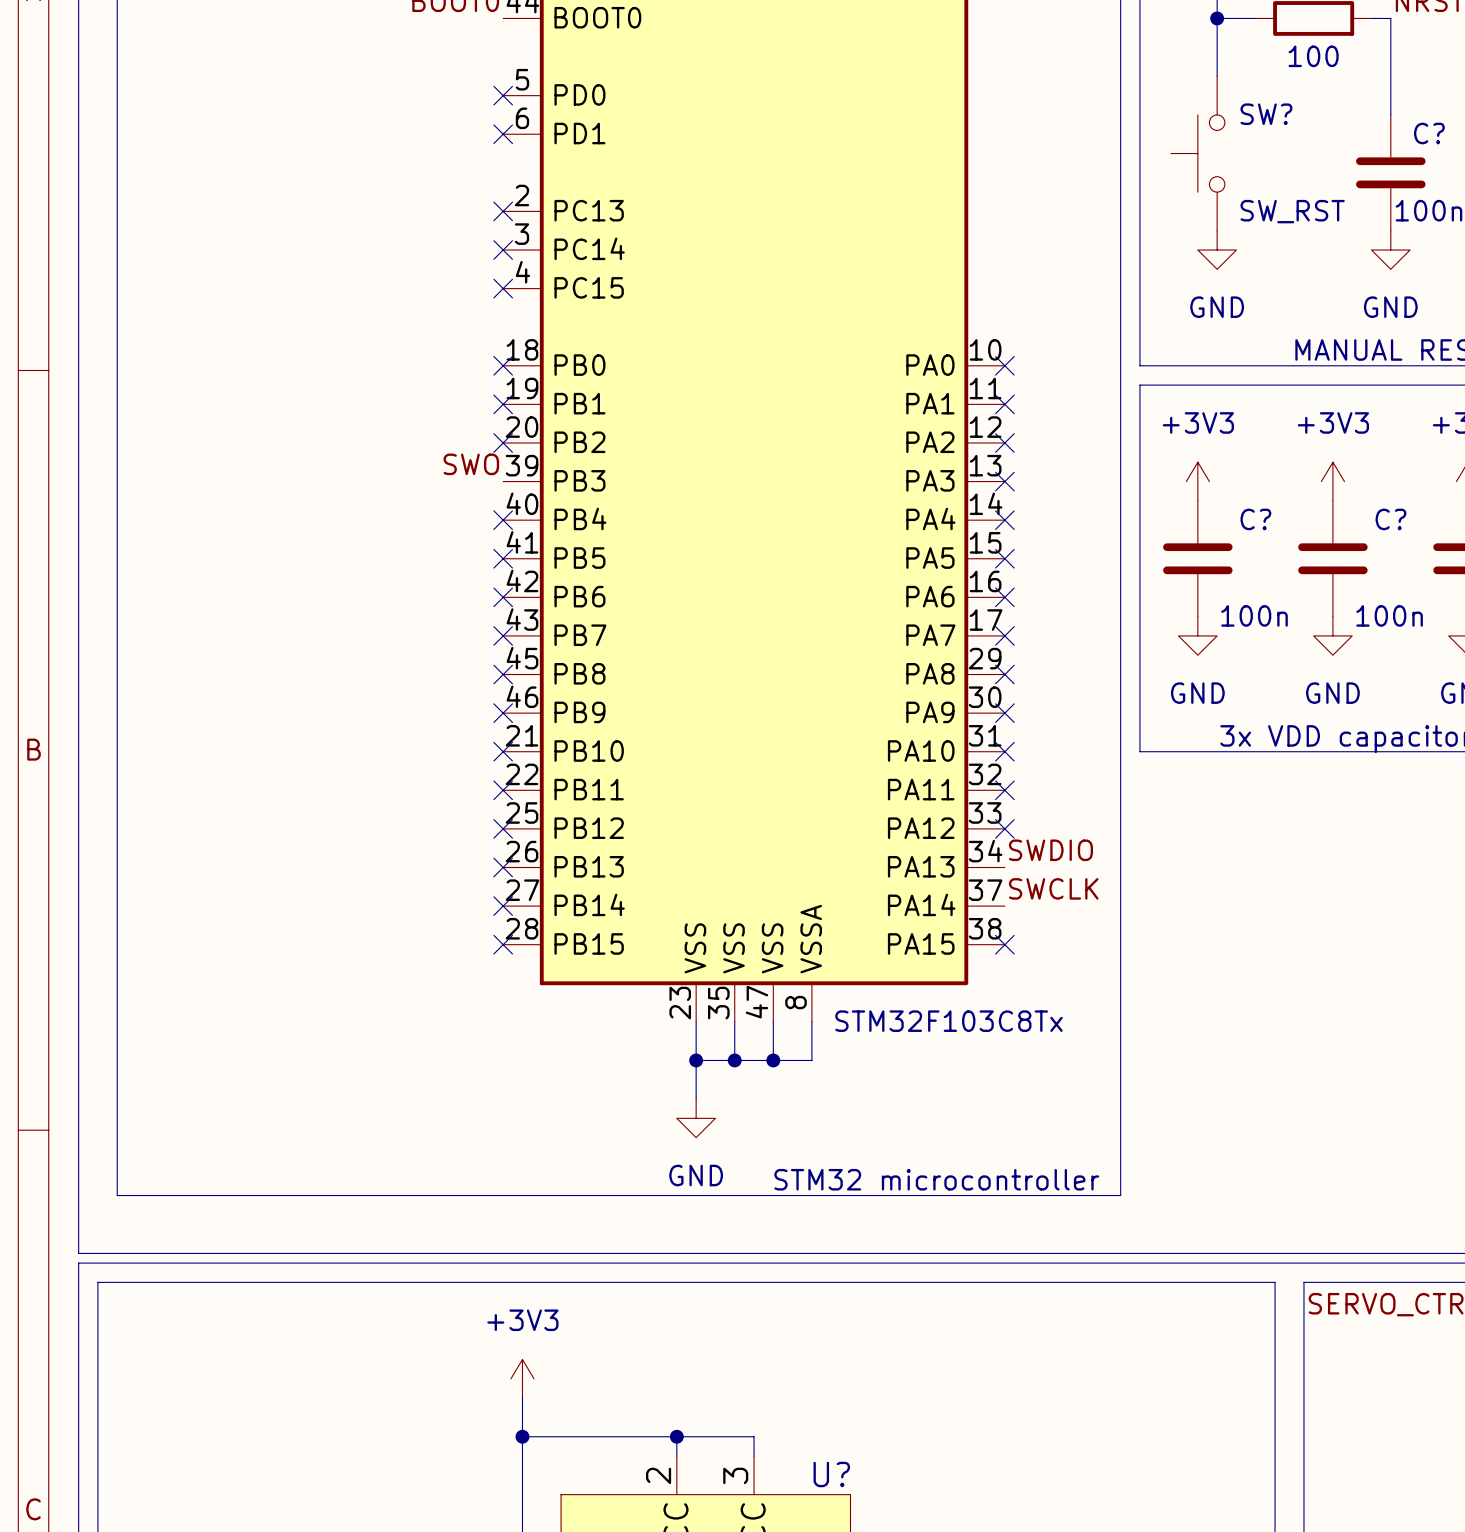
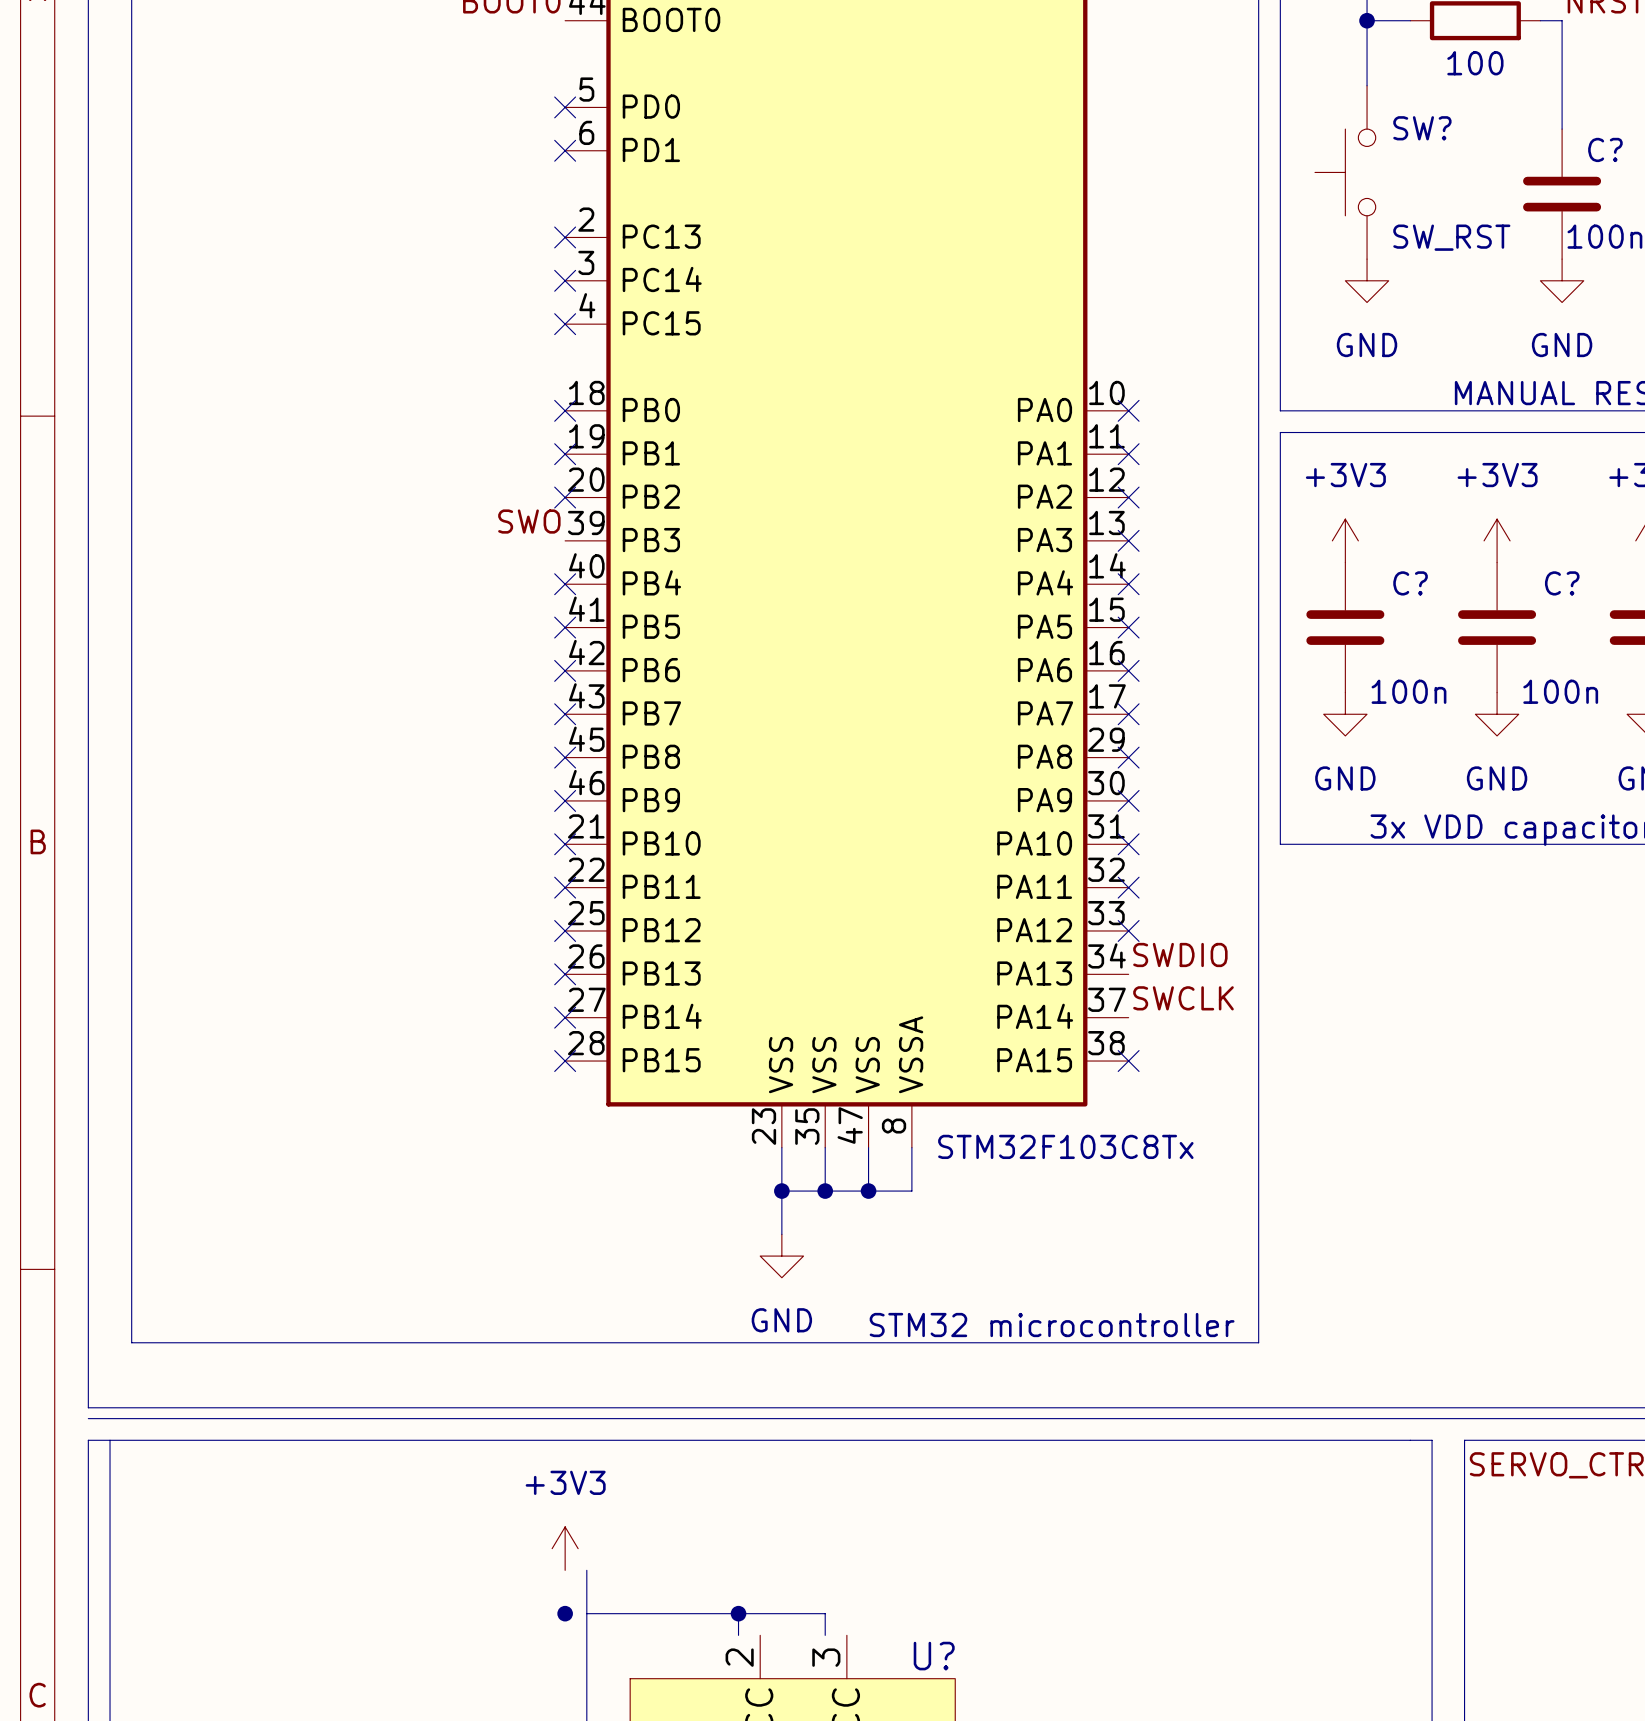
line: (78, 1263) (78, 1282) -> (110, 1440) (88, 1440)
power symbol position: +3V3 (522, 1378) -> +3V3 (565, 1548)
junction position: (522, 1436) -> (565, 1613)
wire: (676, 1436) (676, 1456) -> (738, 1613) (738, 1635)
junction position: (676, 1436) -> (738, 1613)
wire: (734, 1436) (754, 1436) (754, 1456) -> (825, 1613) (825, 1635)

